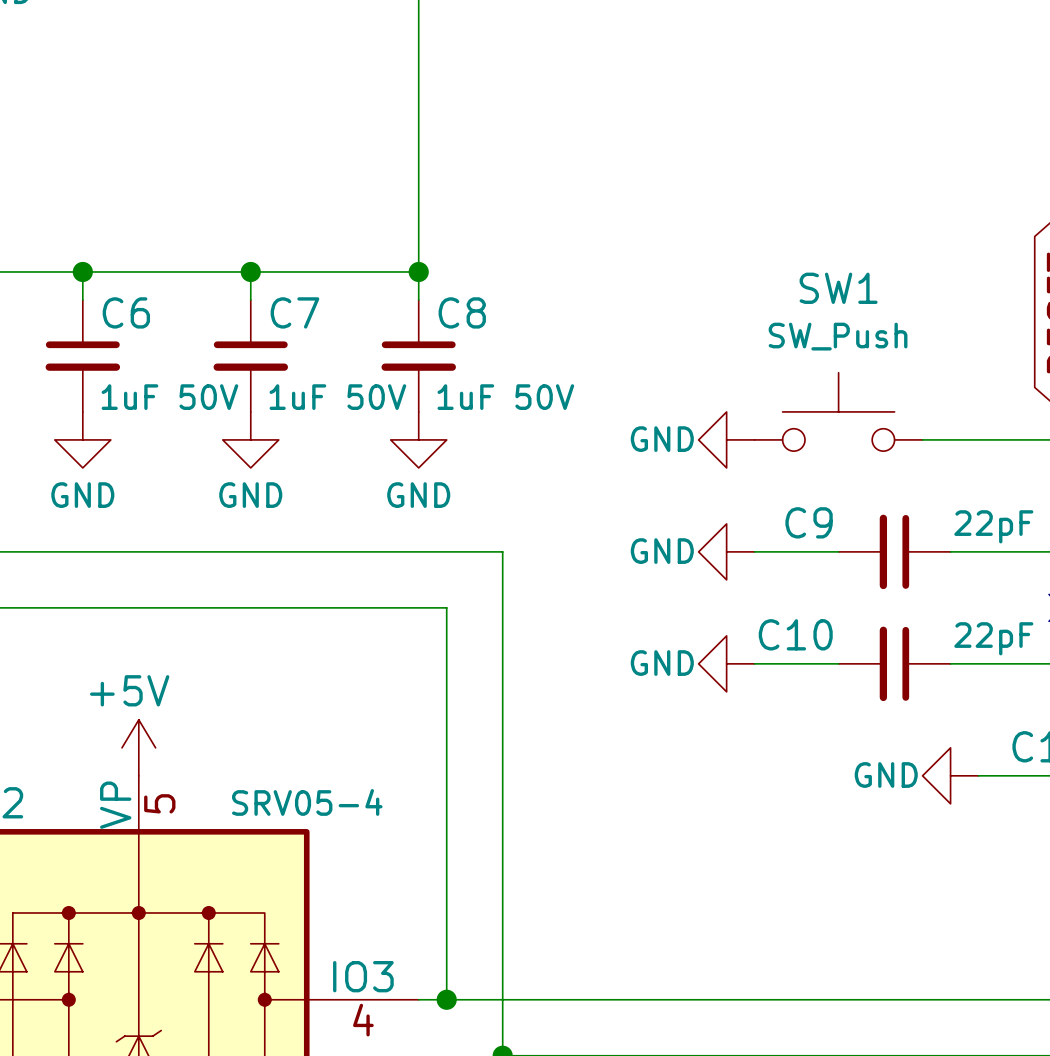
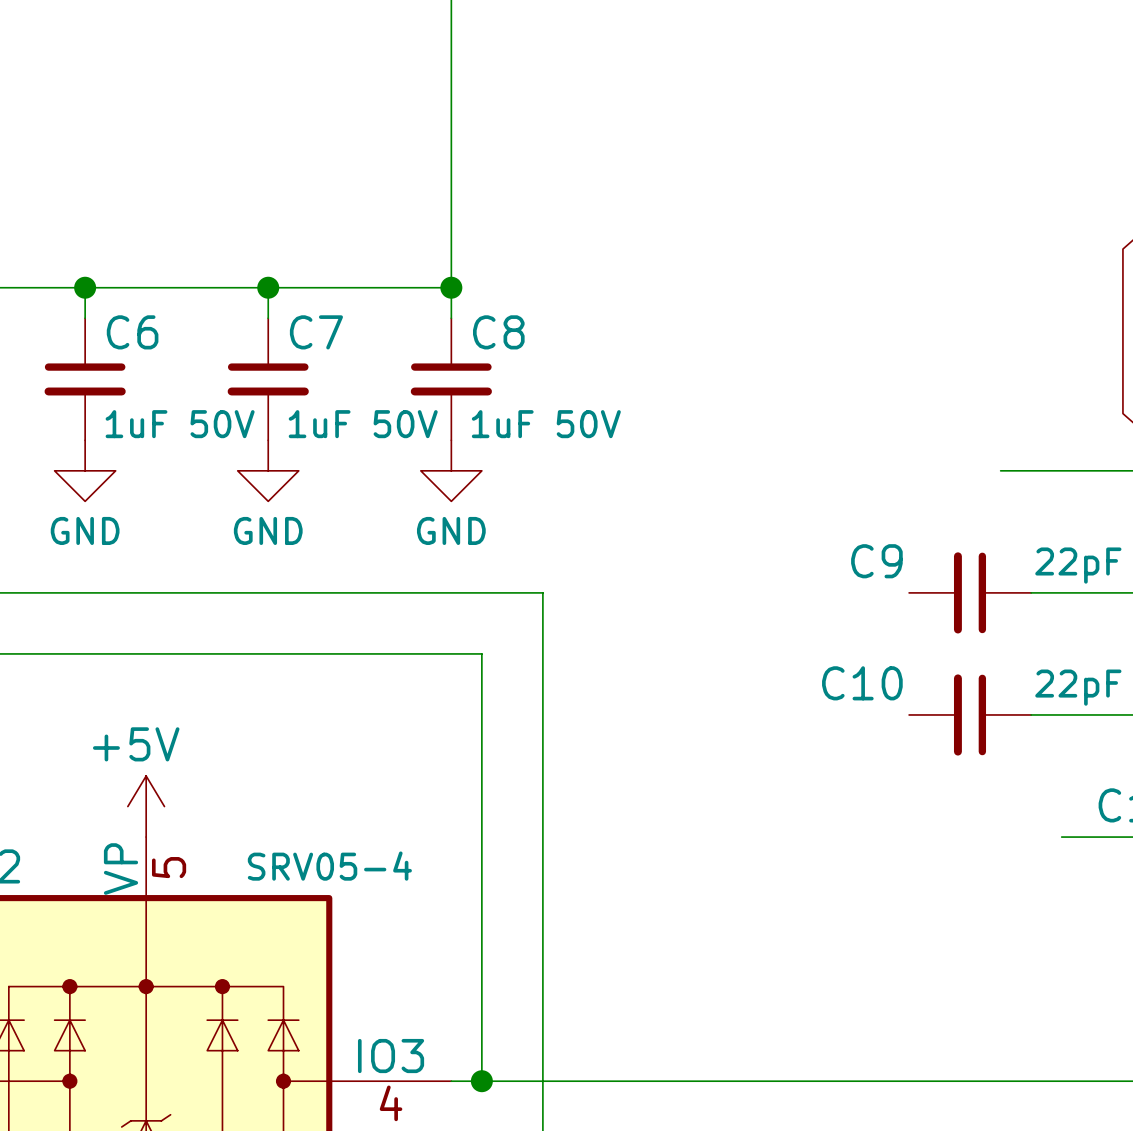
SW1: SW_Push (838, 411) -> none
power symbol: GND (726, 439) -> none
power symbol: GND (726, 551) -> none
wire: (754, 551) (838, 551) -> none
power symbol: GND (726, 663) -> none
wire: (754, 663) (838, 663) -> none
power symbol: GND (950, 775) -> none

